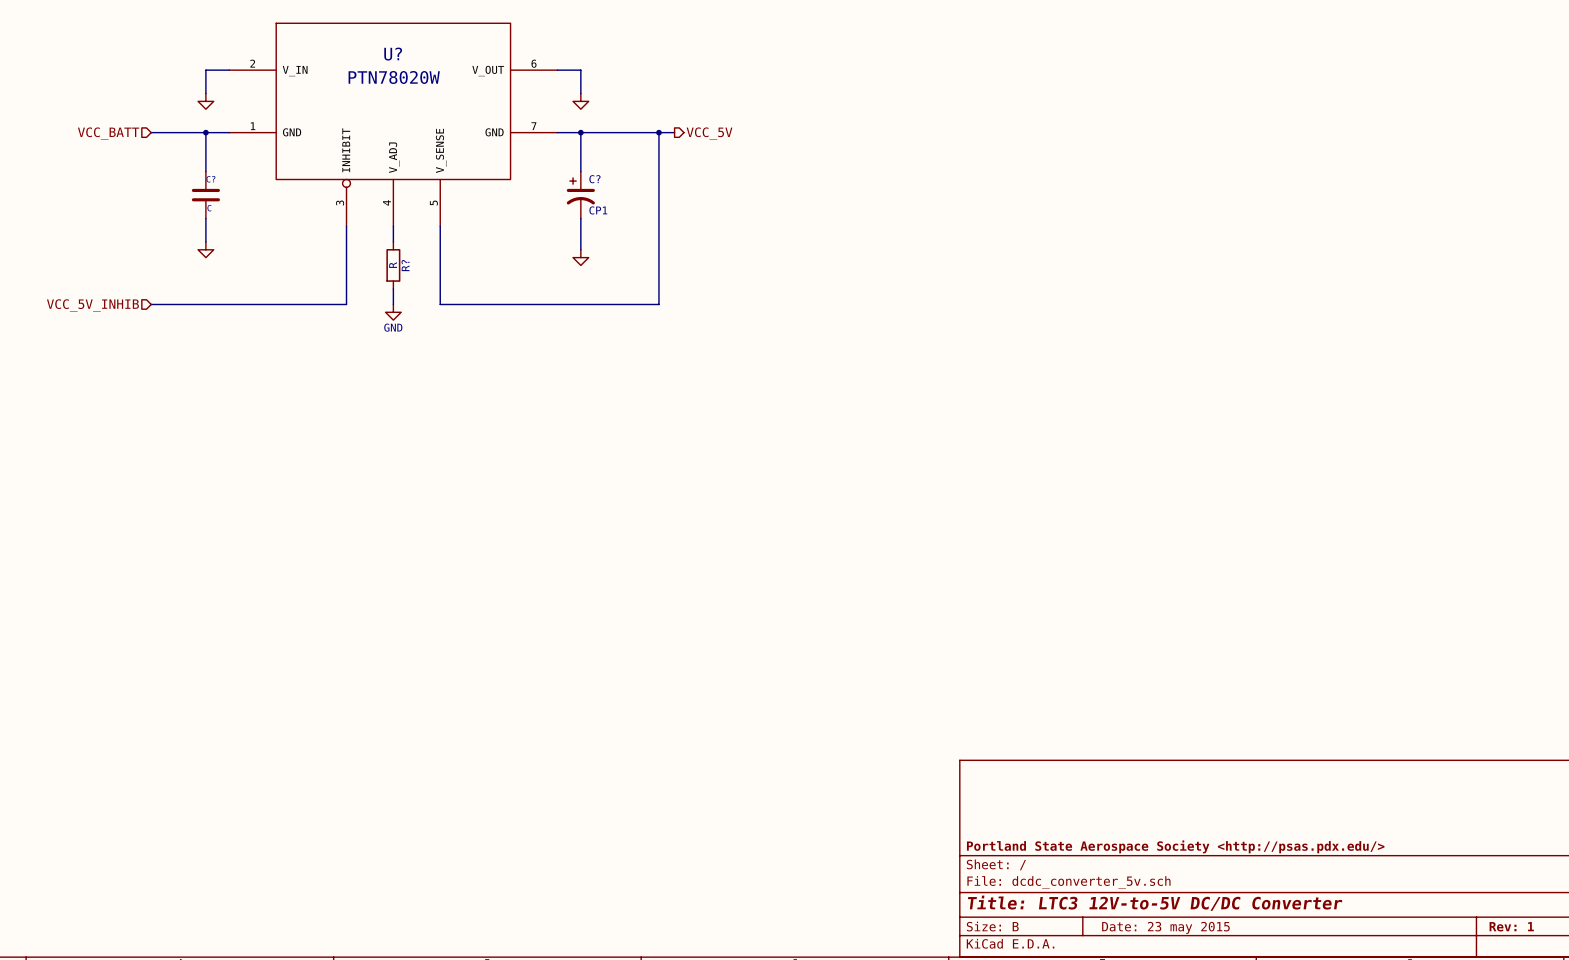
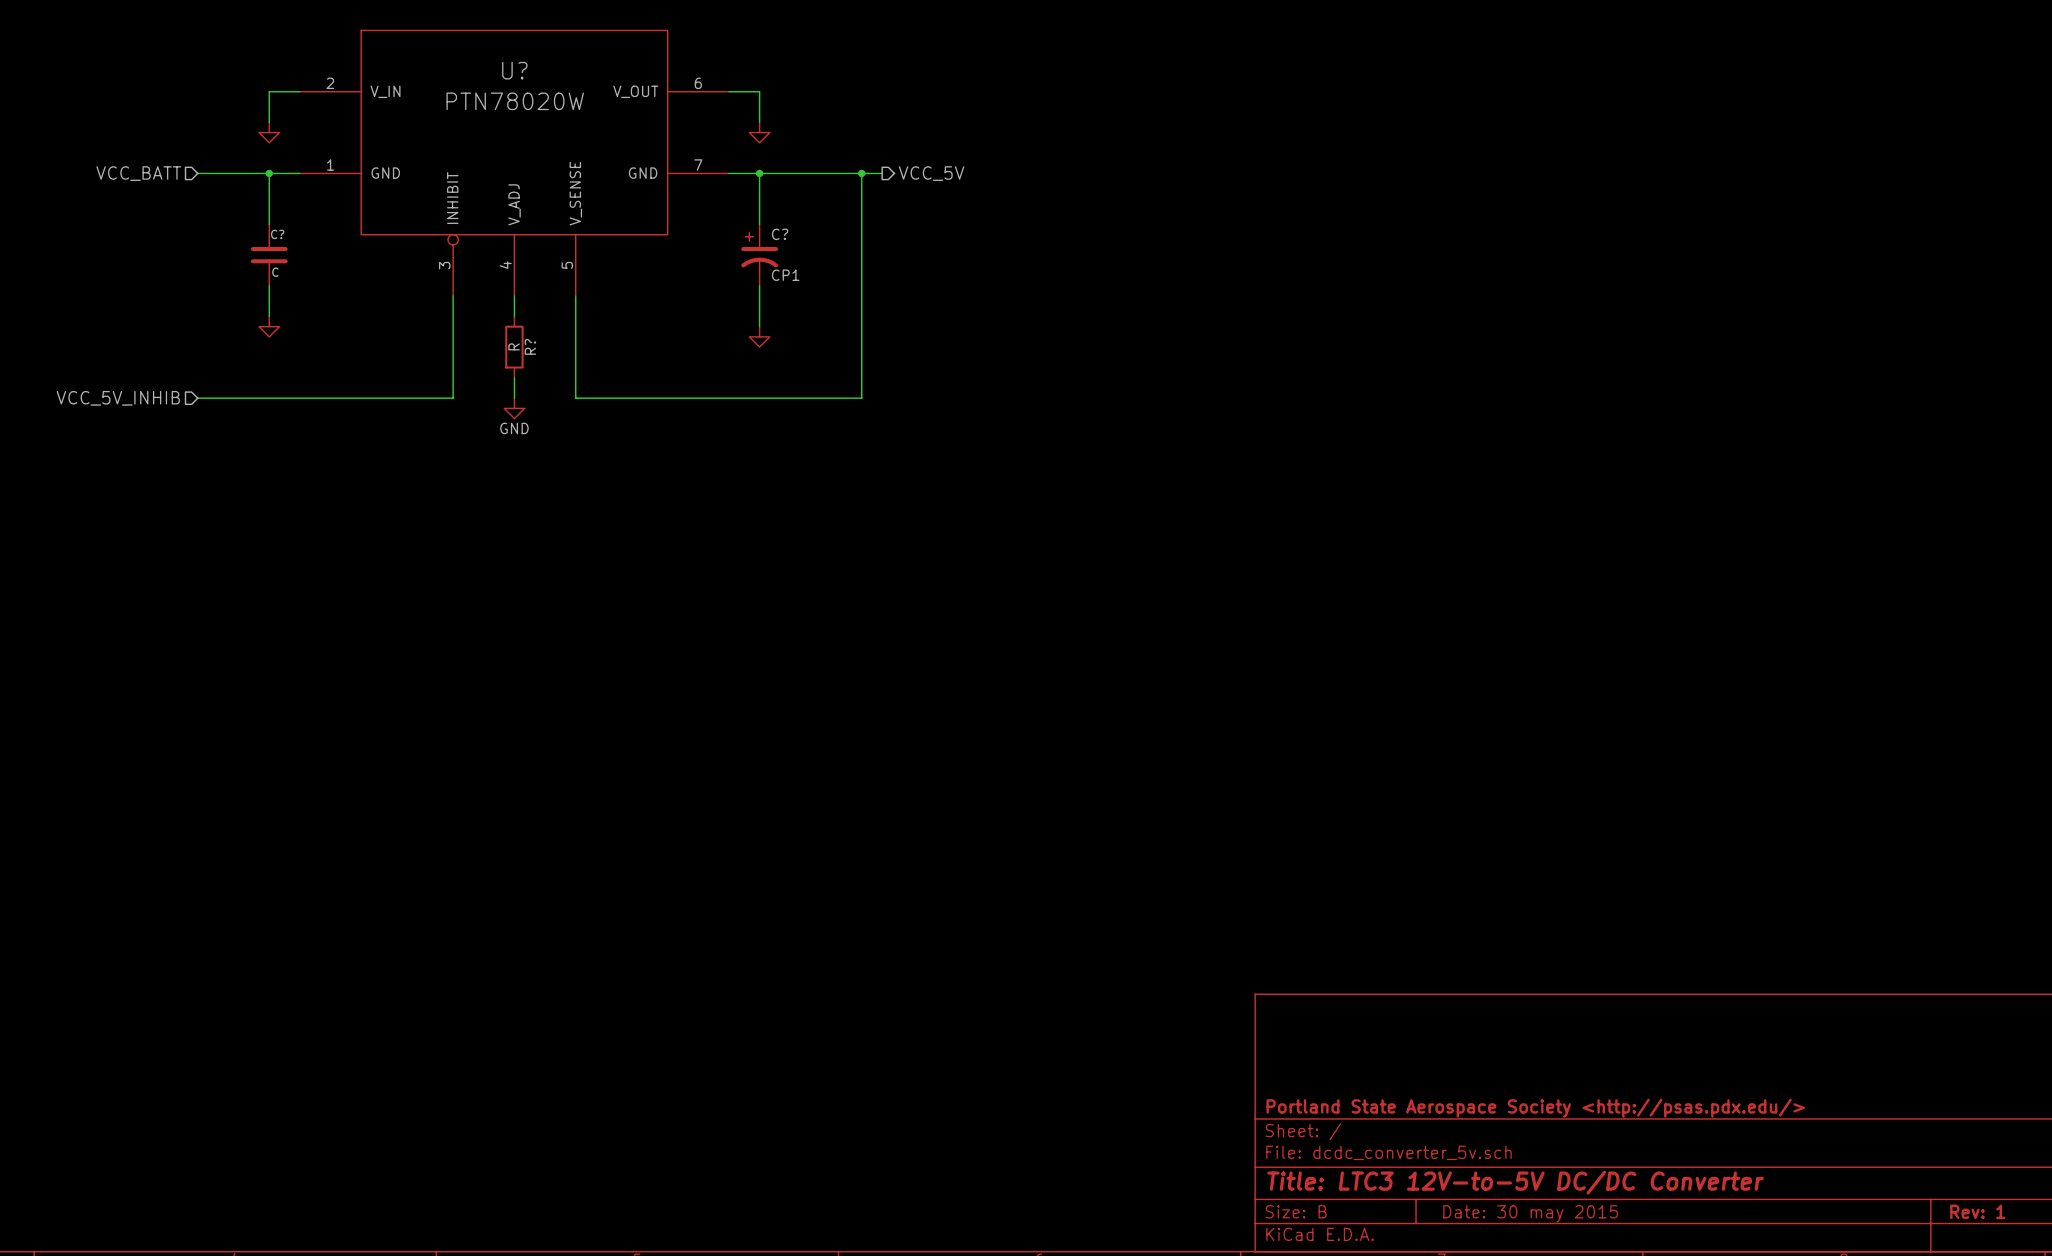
title block: Date: 23 may 2015 (1165, 927) -> Date: 30 may 2015 (1530, 1213)

